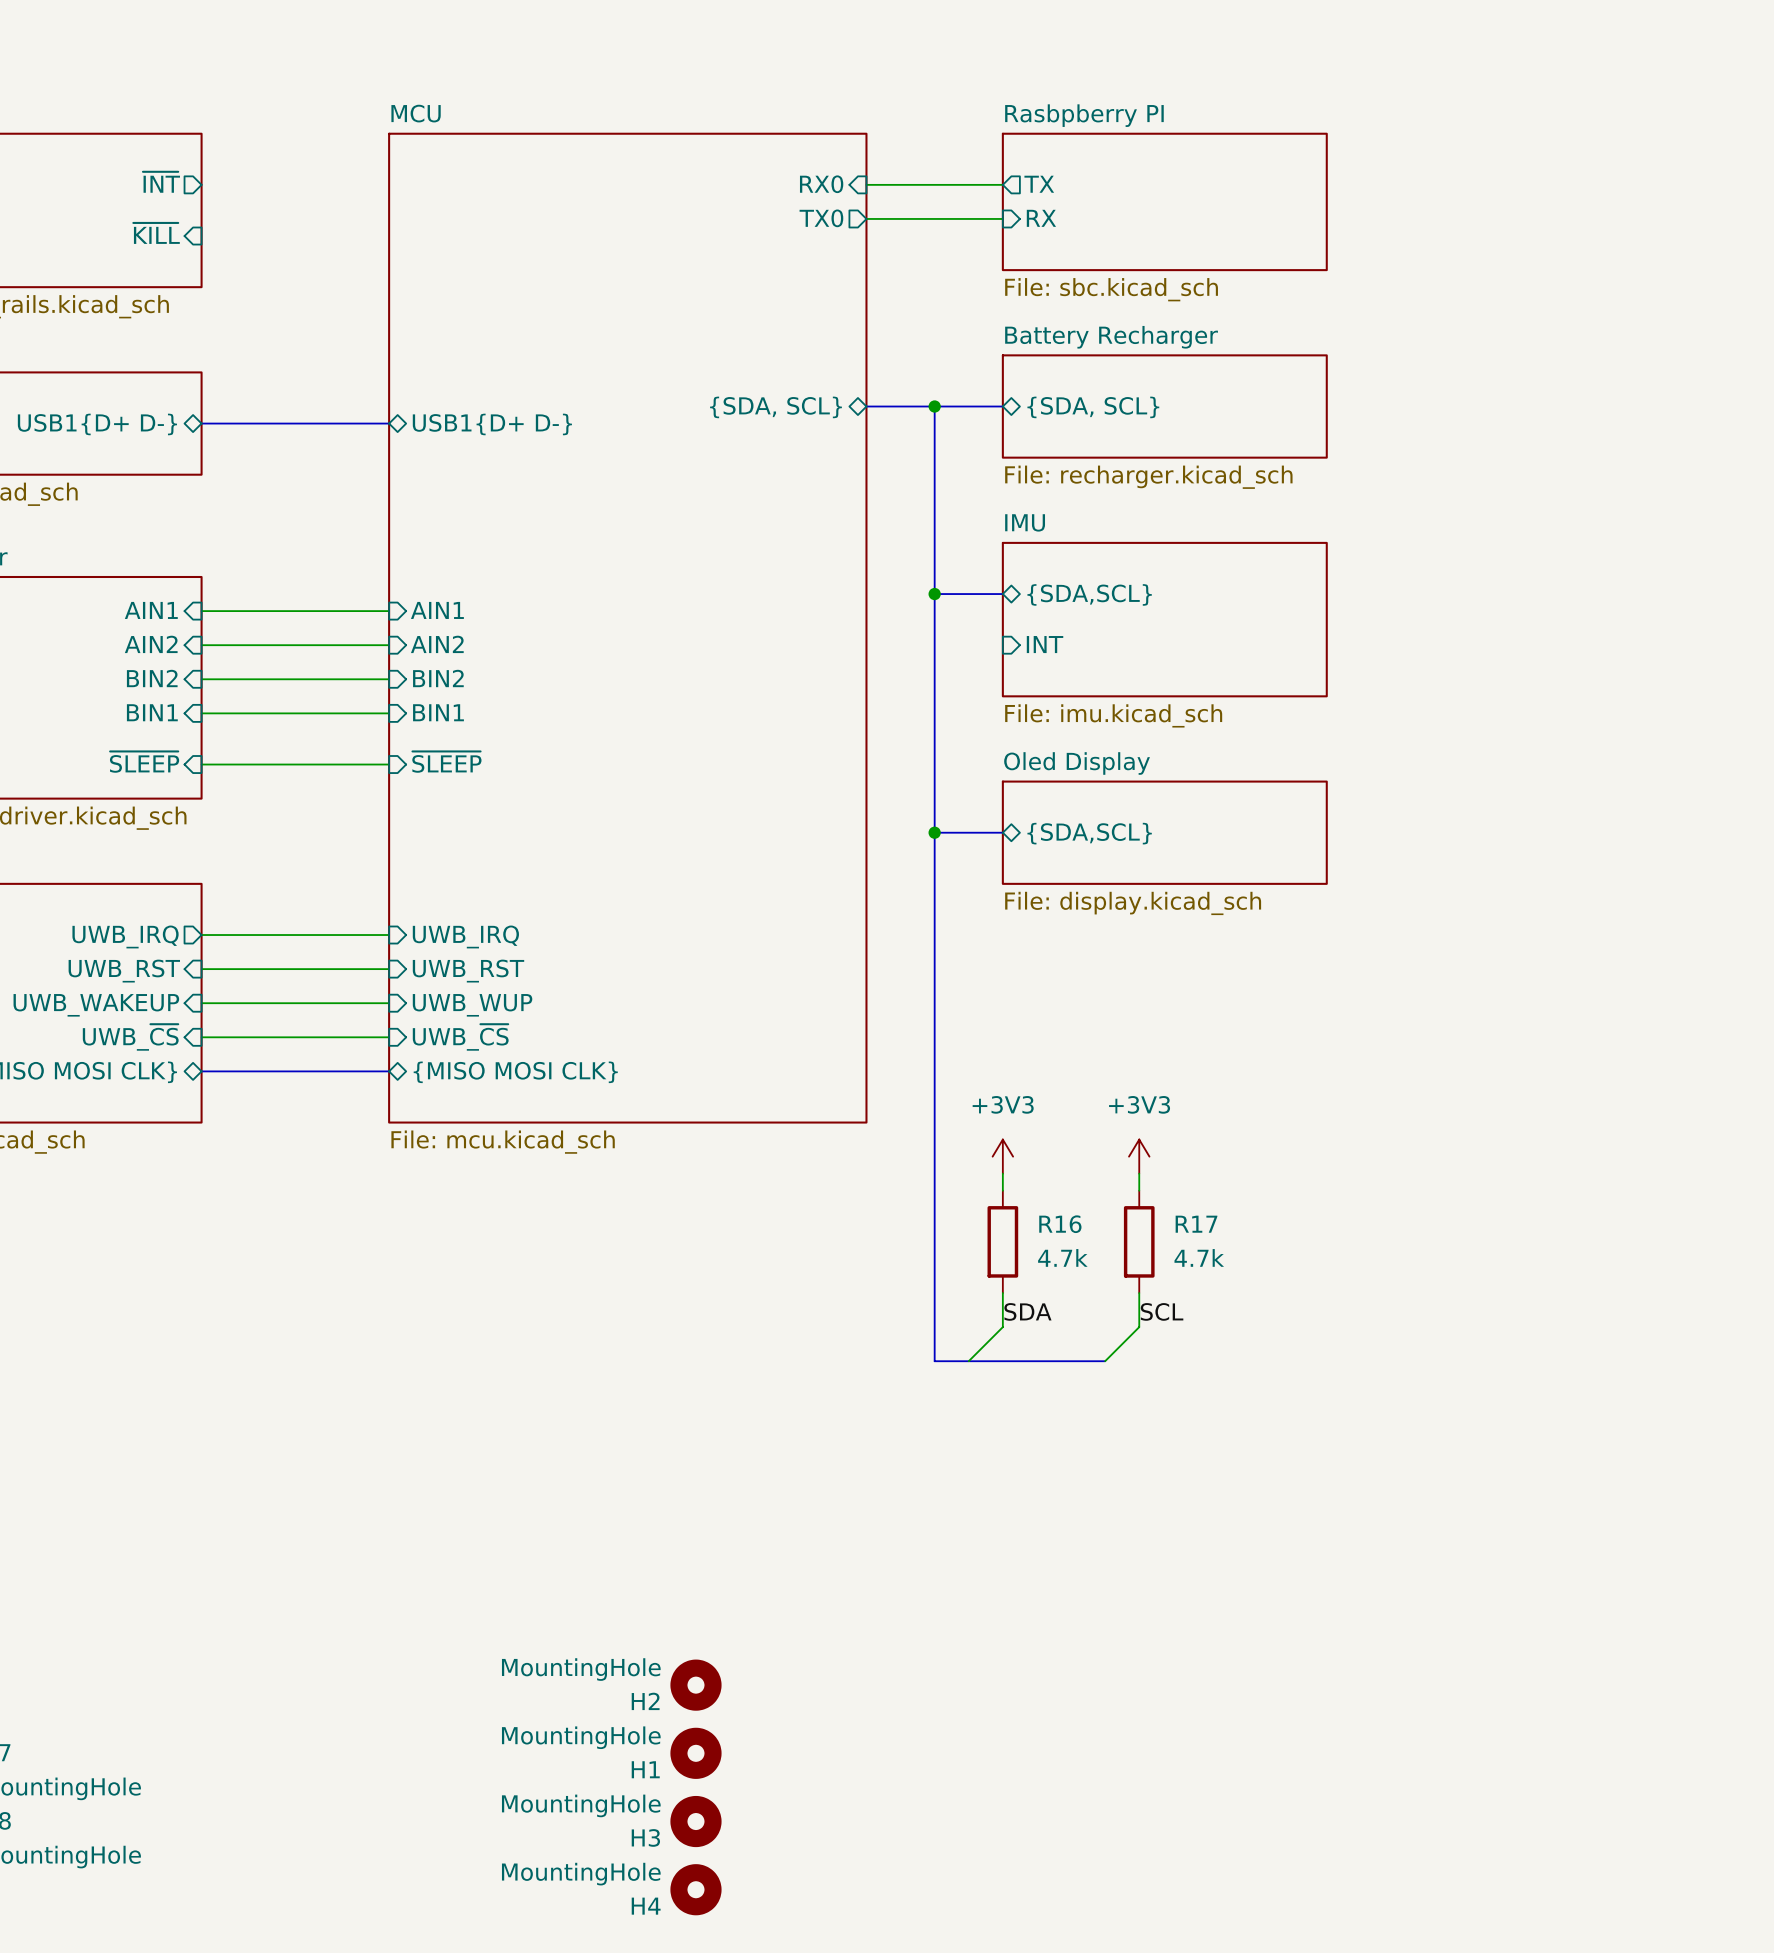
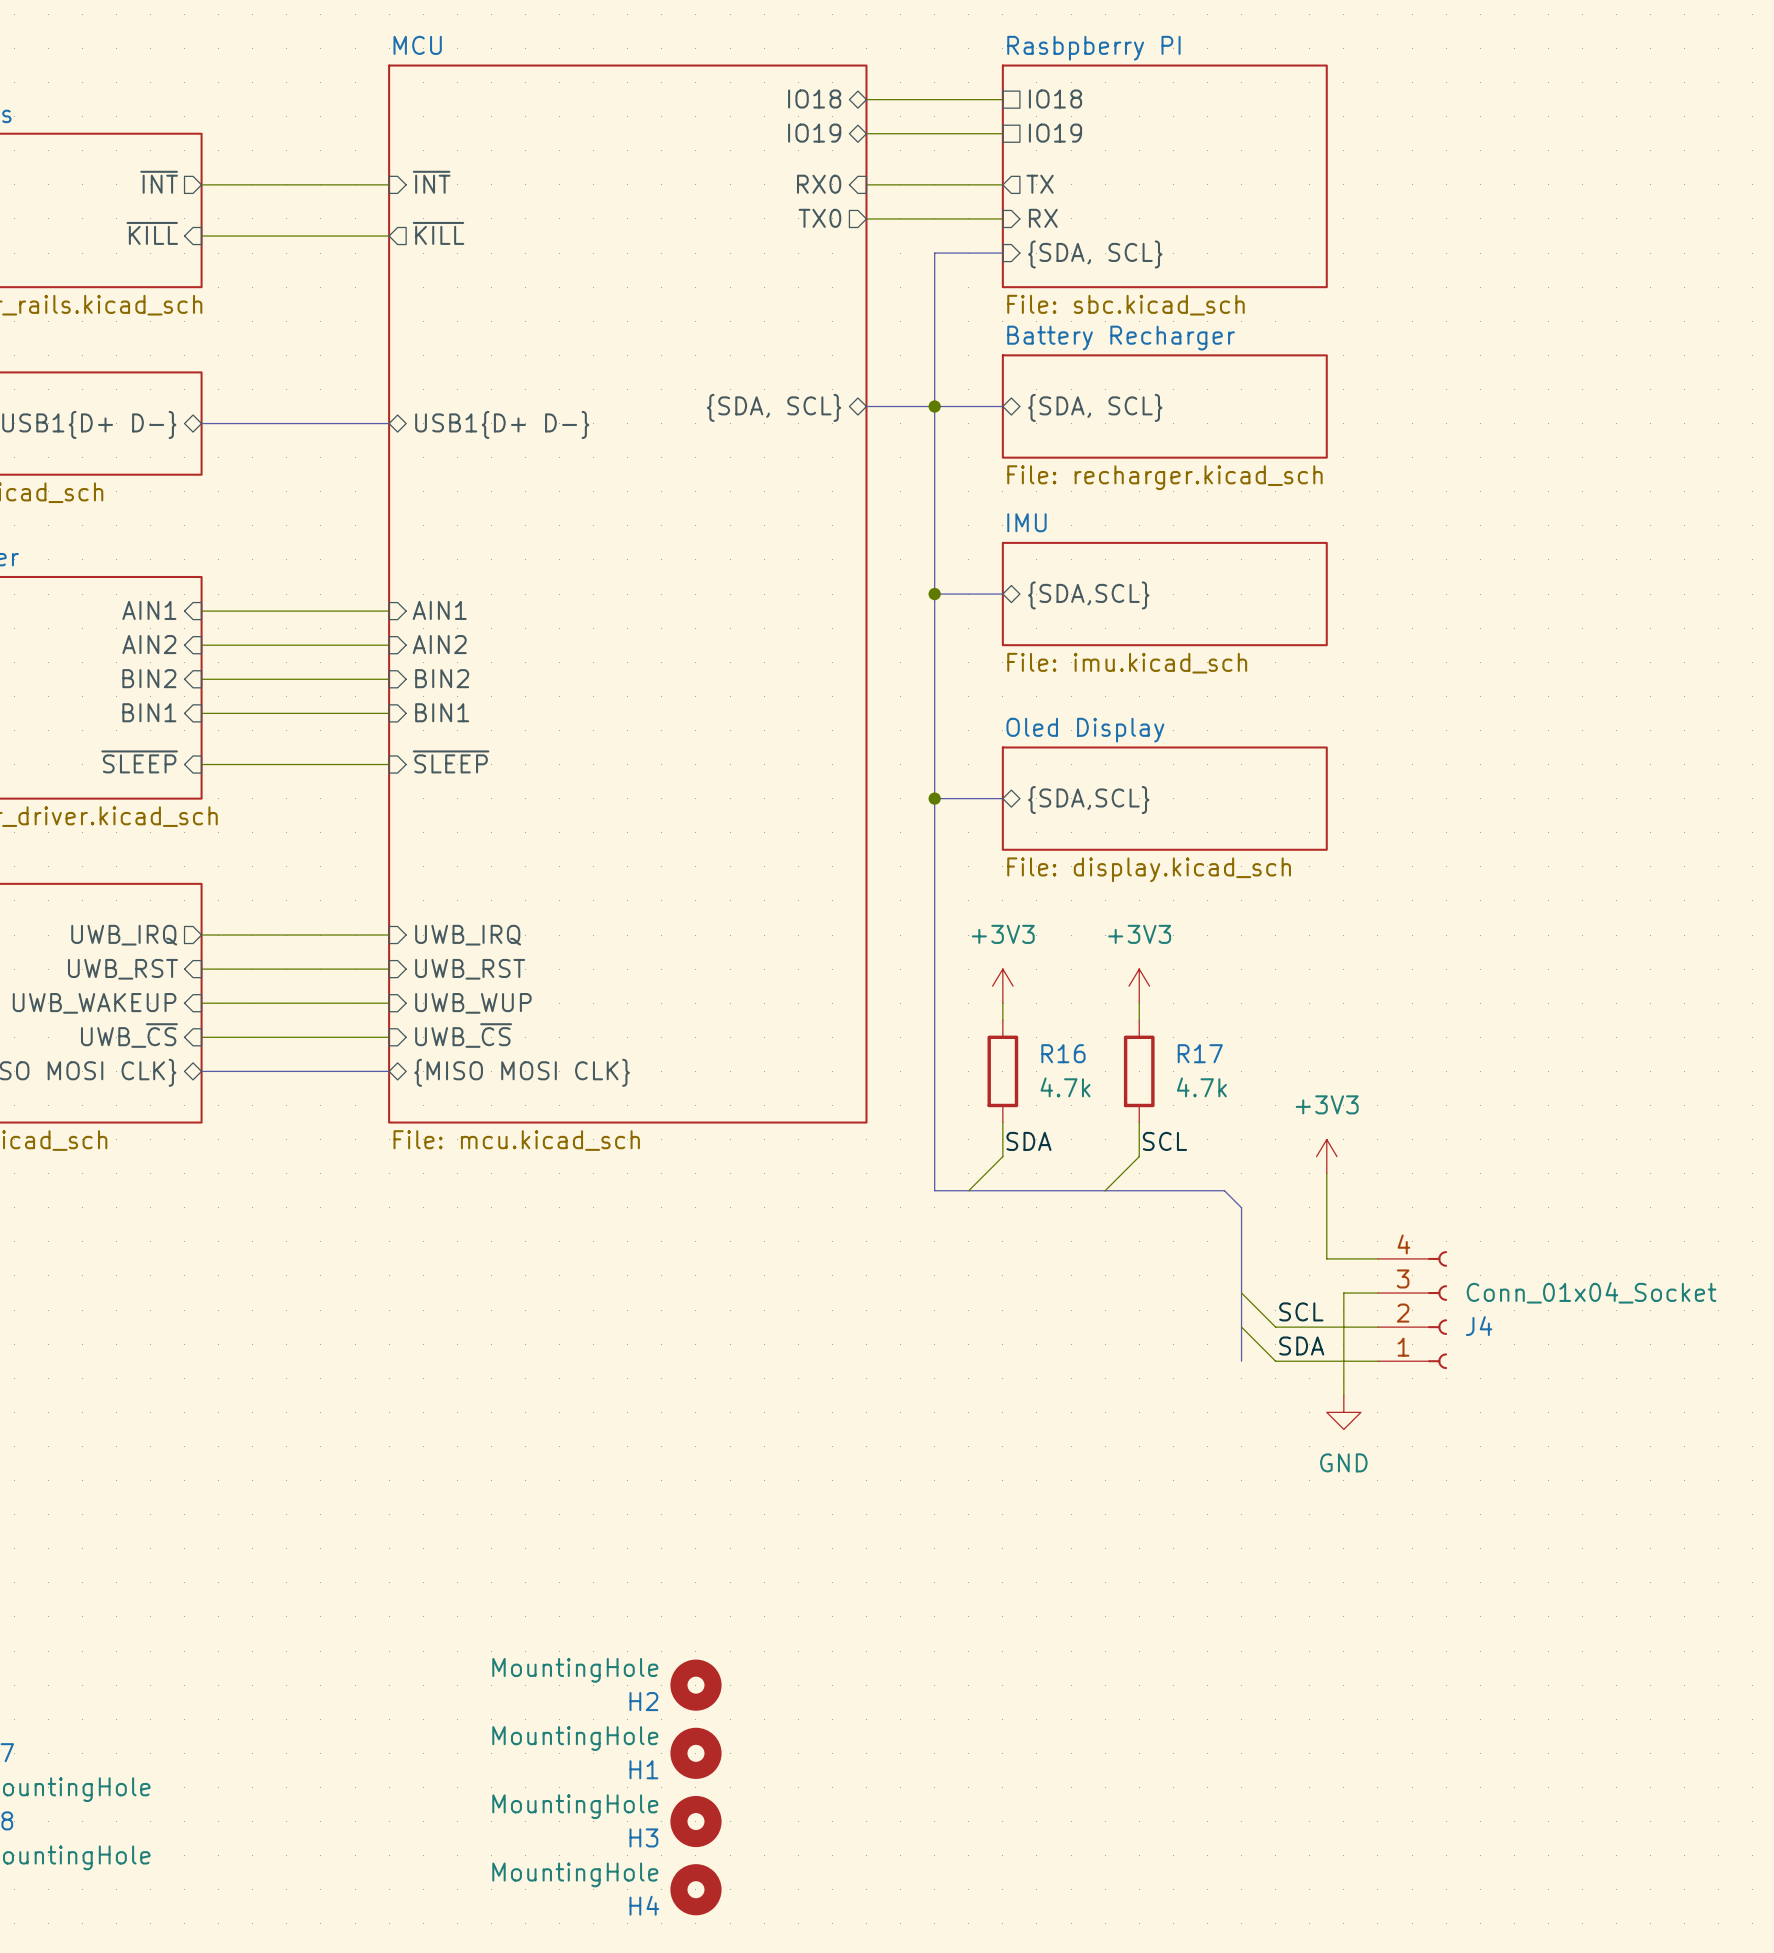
sheet pin: none -> IO18 (814, 98)
wire: none -> (866, 99) (1002, 99)
sheet pin: none -> IO18 (1055, 98)
sheet pin: none -> IO19 (814, 133)
wire: none -> (866, 133) (1002, 133)
sheet pin: none -> IO19 (1055, 133)
sheet Rasbpberry PI: none -> File: sbc.kicad_sch (1164, 176)
sheet pin: none -> ~{INT} (431, 182)
wire: none -> (201, 184) (389, 184)
sheet Rasbpberry PI: File: sbc.kicad_sch (1164, 201) -> none
sheet pin: none -> ~{KILL} (438, 233)
wire: none -> (201, 236) (389, 236)
bus: none -> (1002, 253) (934, 253) (934, 406)
sheet pin: none -> {SDA, SCL} (1095, 254)
sheet MCU: none -> File: mcu.kicad_sch (627, 594)
sheet IMU: none -> File: imu.kicad_sch (1164, 594)
sheet IMU: File: imu.kicad_sch (1164, 619) -> none
sheet MCU: File: mcu.kicad_sch (627, 628) -> none
sheet pin: INT (1045, 644) -> none
bus: (934, 832) (1002, 832) -> (934, 798) (1002, 798)
junction position: (934, 832) -> (934, 798)
sheet Oled Display position: (1164, 832) -> (1164, 798)
sheet pin position: {SDA,SCL} (1089, 833) -> {SDA,SCL} (1088, 800)
power symbol: none -> +3V3 (1002, 986)
power symbol: none -> +3V3 (1139, 986)
label: none -> SDA (1028, 1141)
label: none -> SCL (1164, 1141)
power symbol: +3V3 (1002, 1156) -> none
power symbol: +3V3 (1139, 1156) -> none
power symbol: none -> +3V3 (1326, 1156)
wire: (1002, 1173) (1002, 1190) -> (1002, 1003) (1002, 1020)
wire: (1139, 1173) (1139, 1190) -> (1139, 1003) (1139, 1020)
wire: none -> (1326, 1173) (1326, 1258) (1377, 1258)
bus: (934, 1190) (934, 1361) (1105, 1361) -> (934, 1190) (1224, 1190) (1241, 1207) (1241, 1361)
R16 position: (1002, 1241) -> (1002, 1071)
R17 position: (1139, 1241) -> (1139, 1071)
wire: (1002, 1293) (1002, 1327) (968, 1361) -> (1002, 1122) (1002, 1156) (968, 1190)
wire: (1139, 1293) (1139, 1327) (1105, 1361) -> (1139, 1122) (1139, 1156) (1105, 1190)
wire: none -> (1241, 1293) (1275, 1327) (1377, 1327)
wire: none -> (1377, 1293) (1343, 1293) (1343, 1395)
J4: none -> Conn_01x04_Socket (1412, 1310)
label: SDA (1027, 1311) -> none
label: SCL (1162, 1311) -> none
label: none -> SCL (1301, 1311)
wire: none -> (1241, 1327) (1275, 1361) (1377, 1361)
label: none -> SDA (1301, 1346)
power symbol: none -> GND (1343, 1412)

